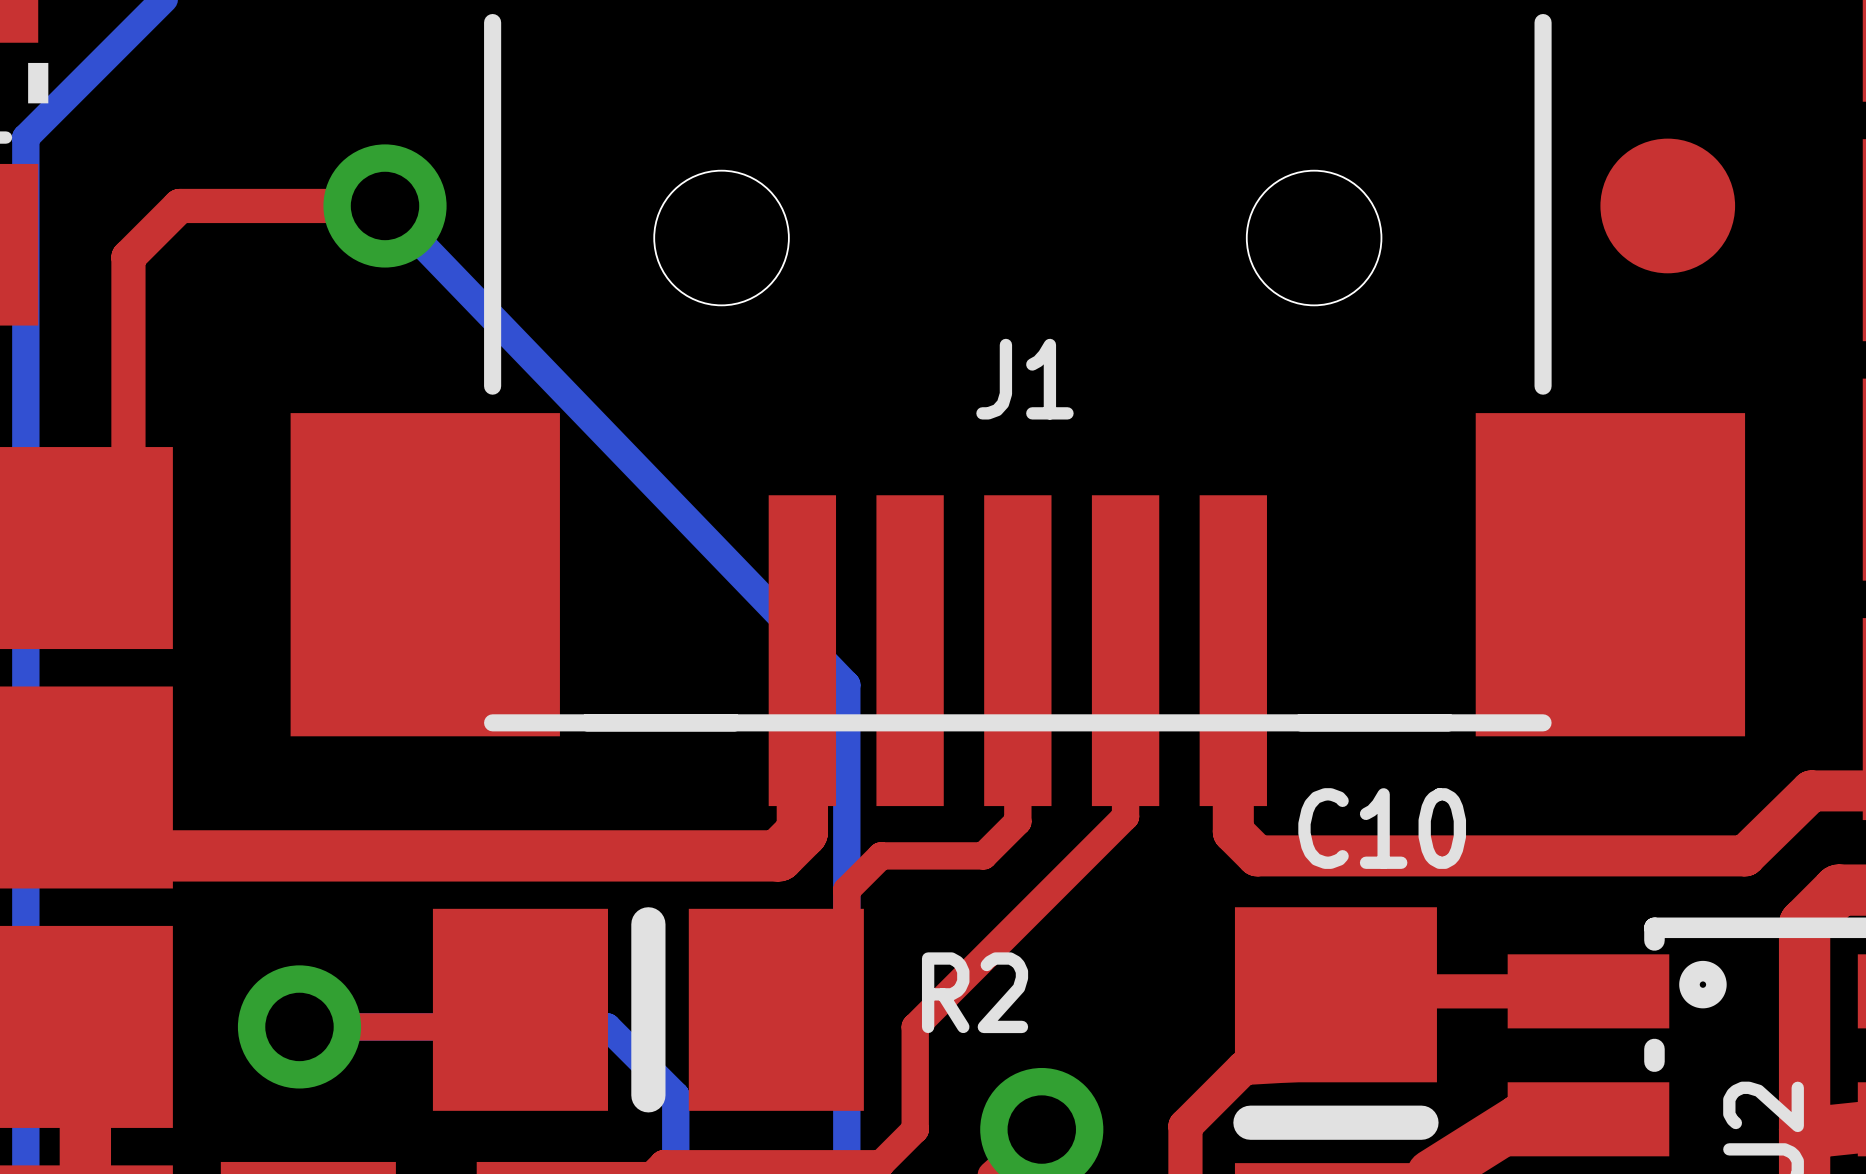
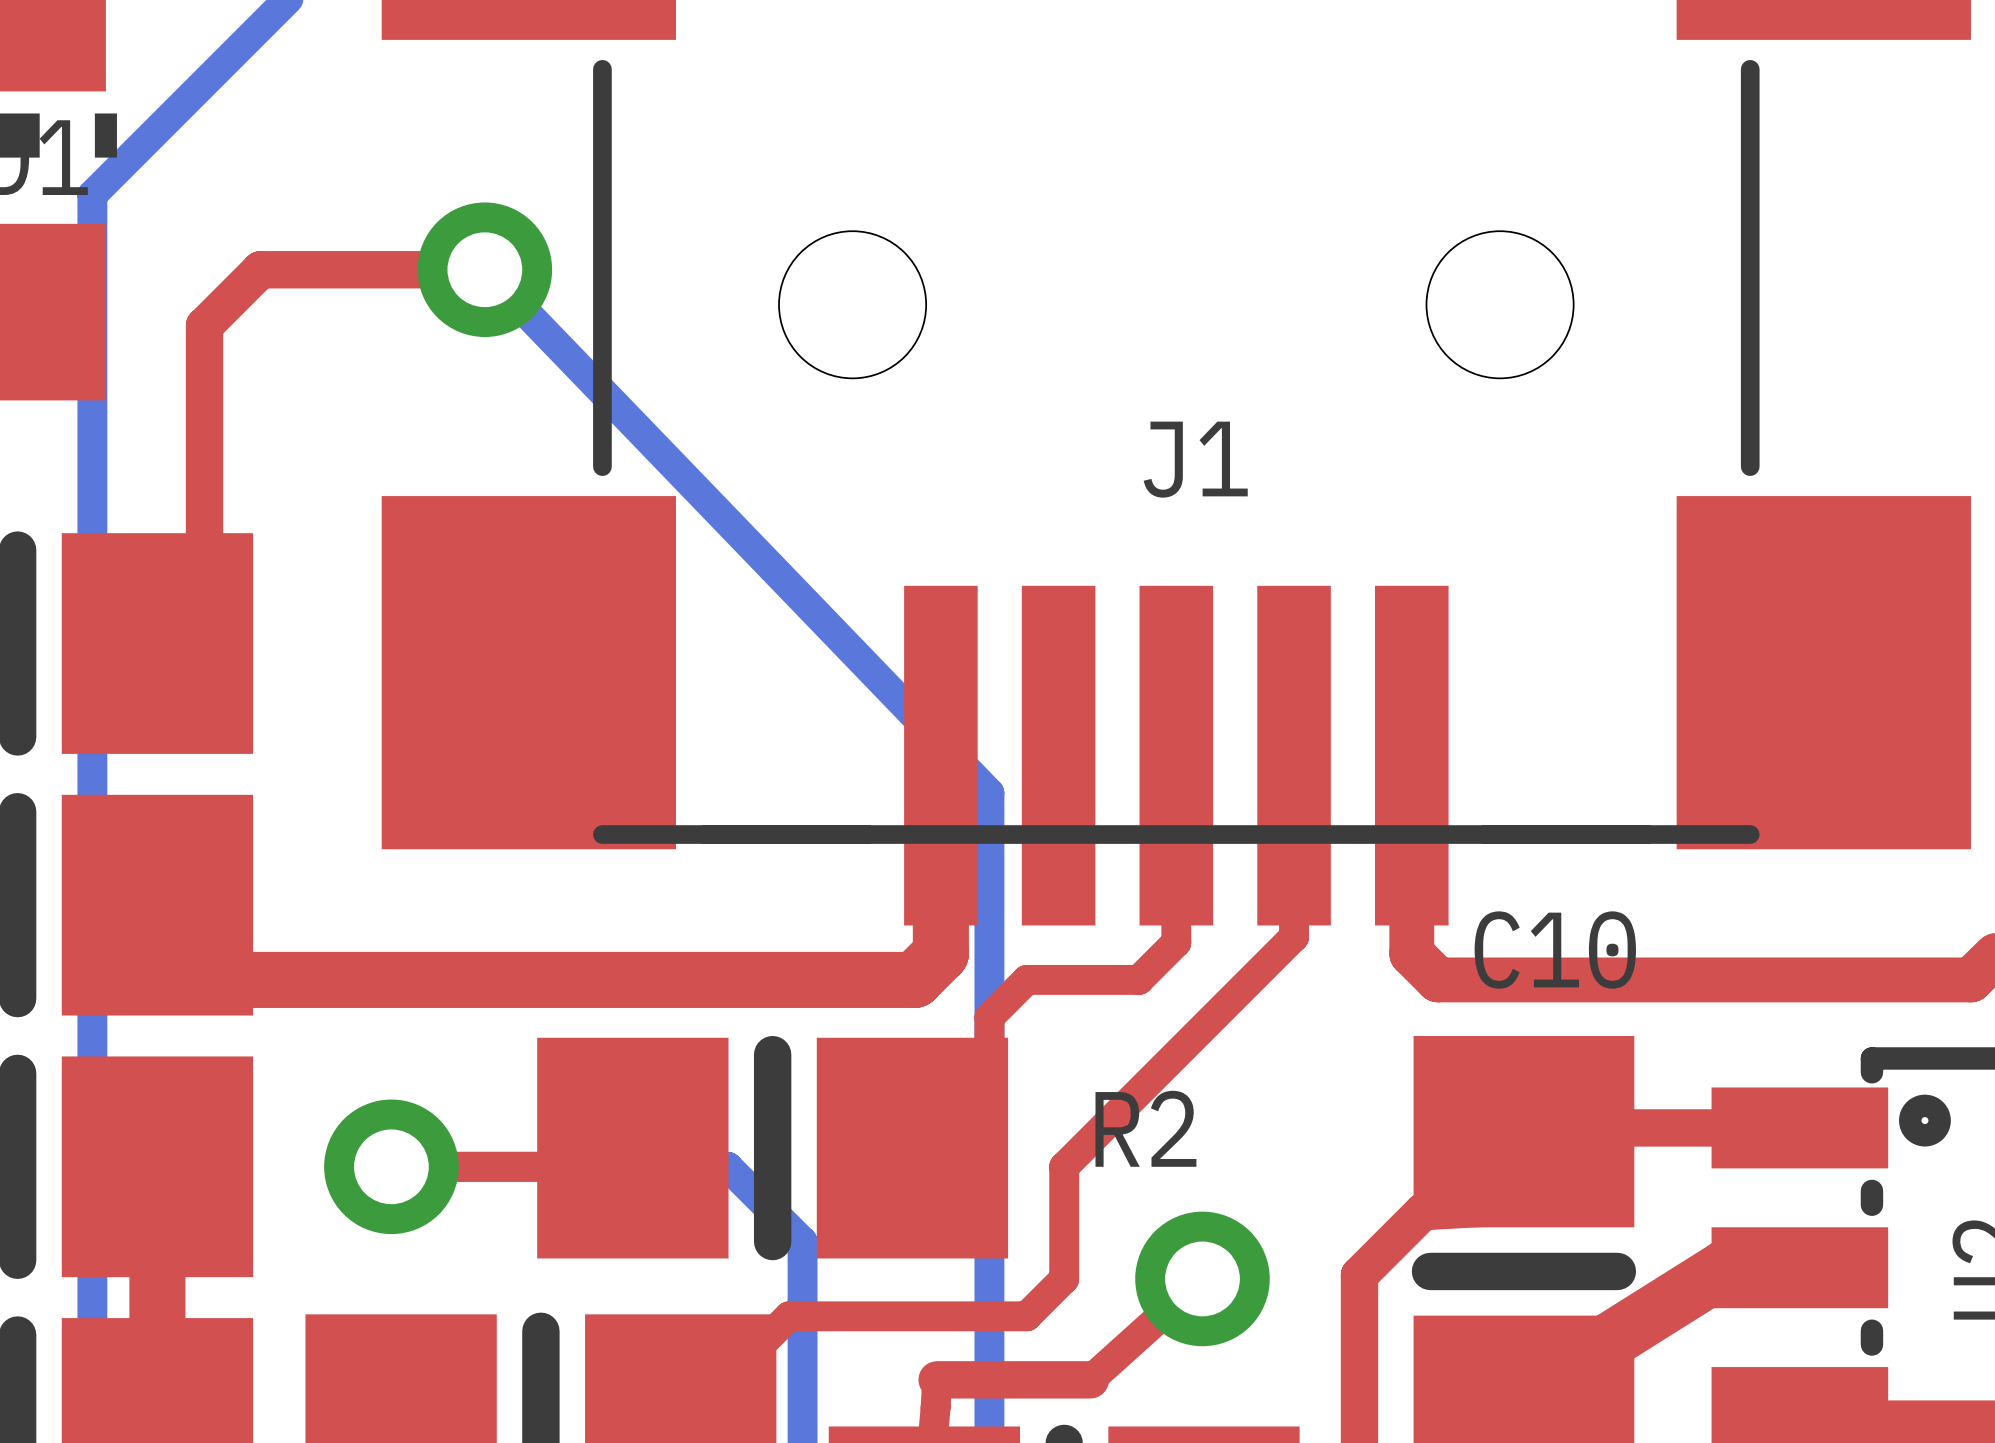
part: (1667, 205) -> none

